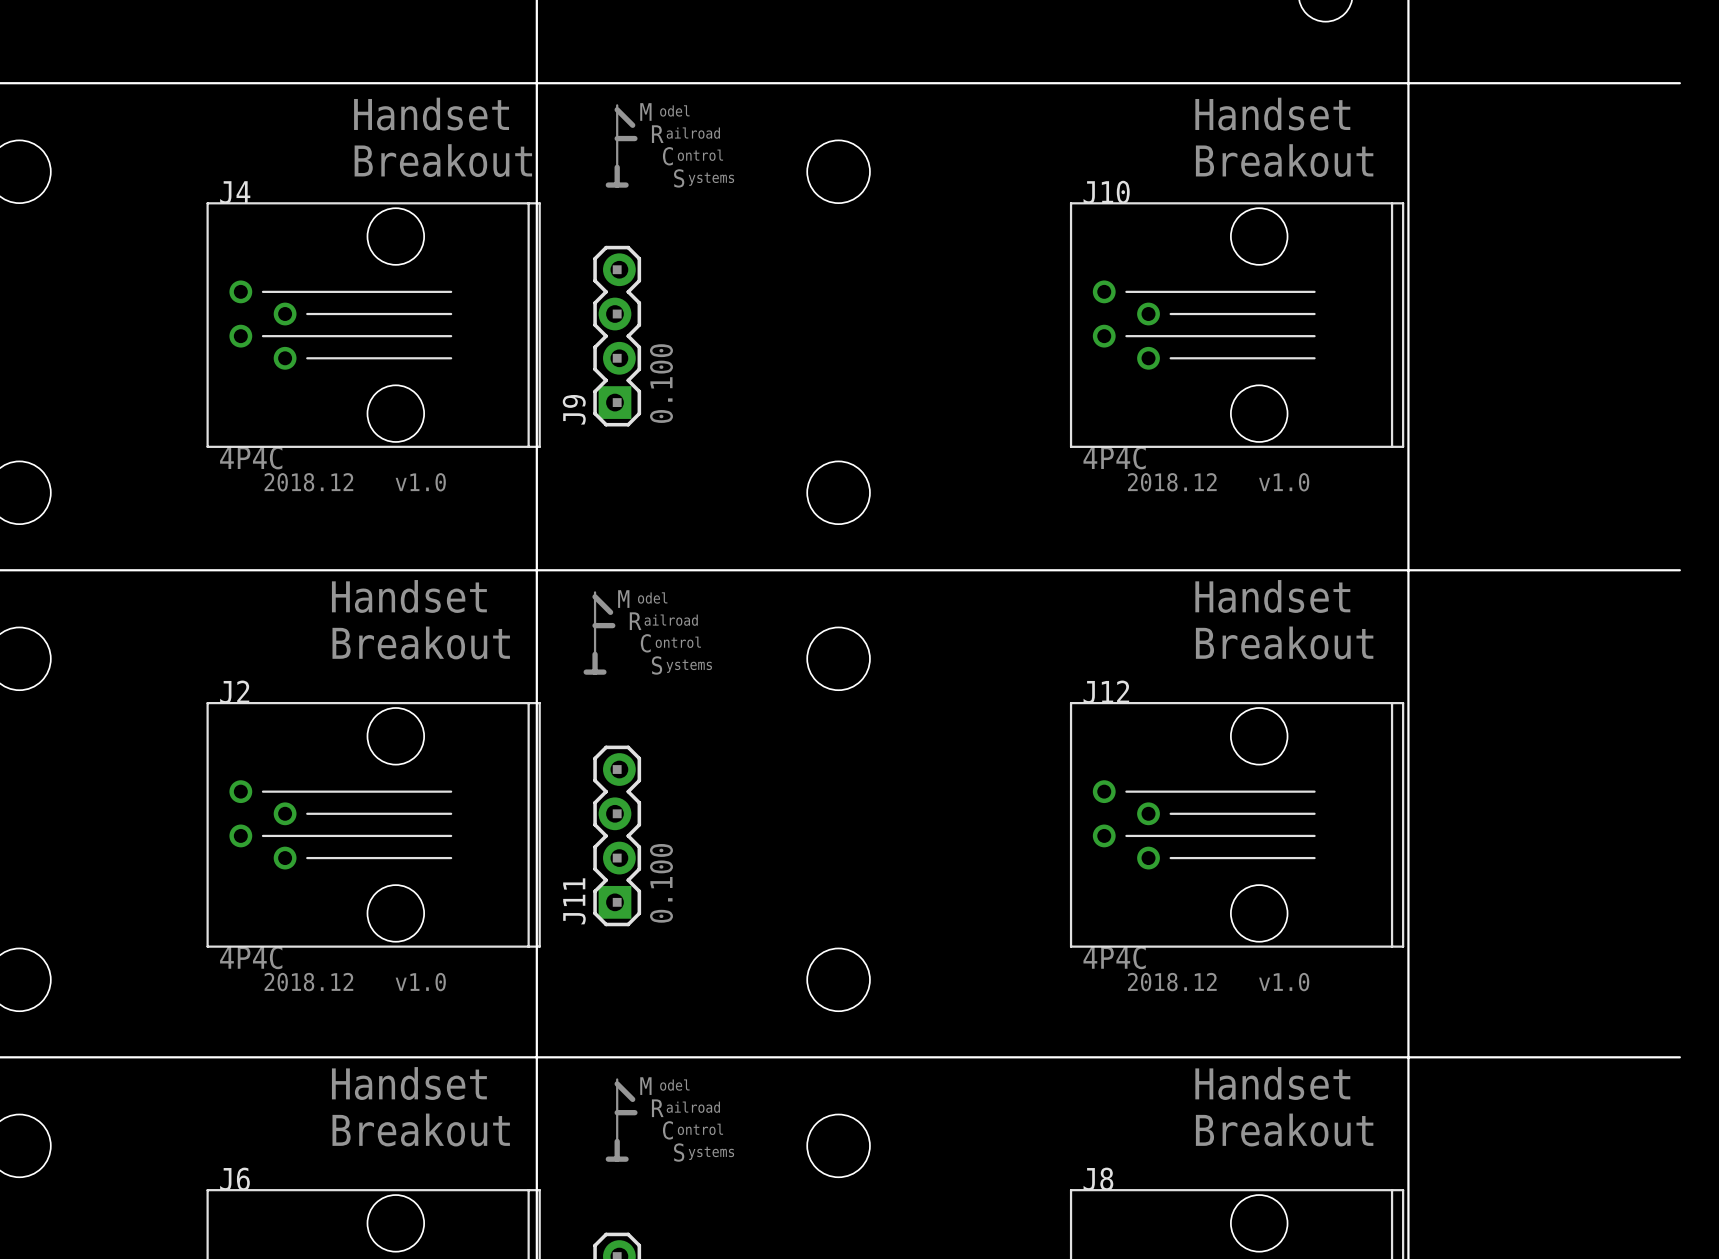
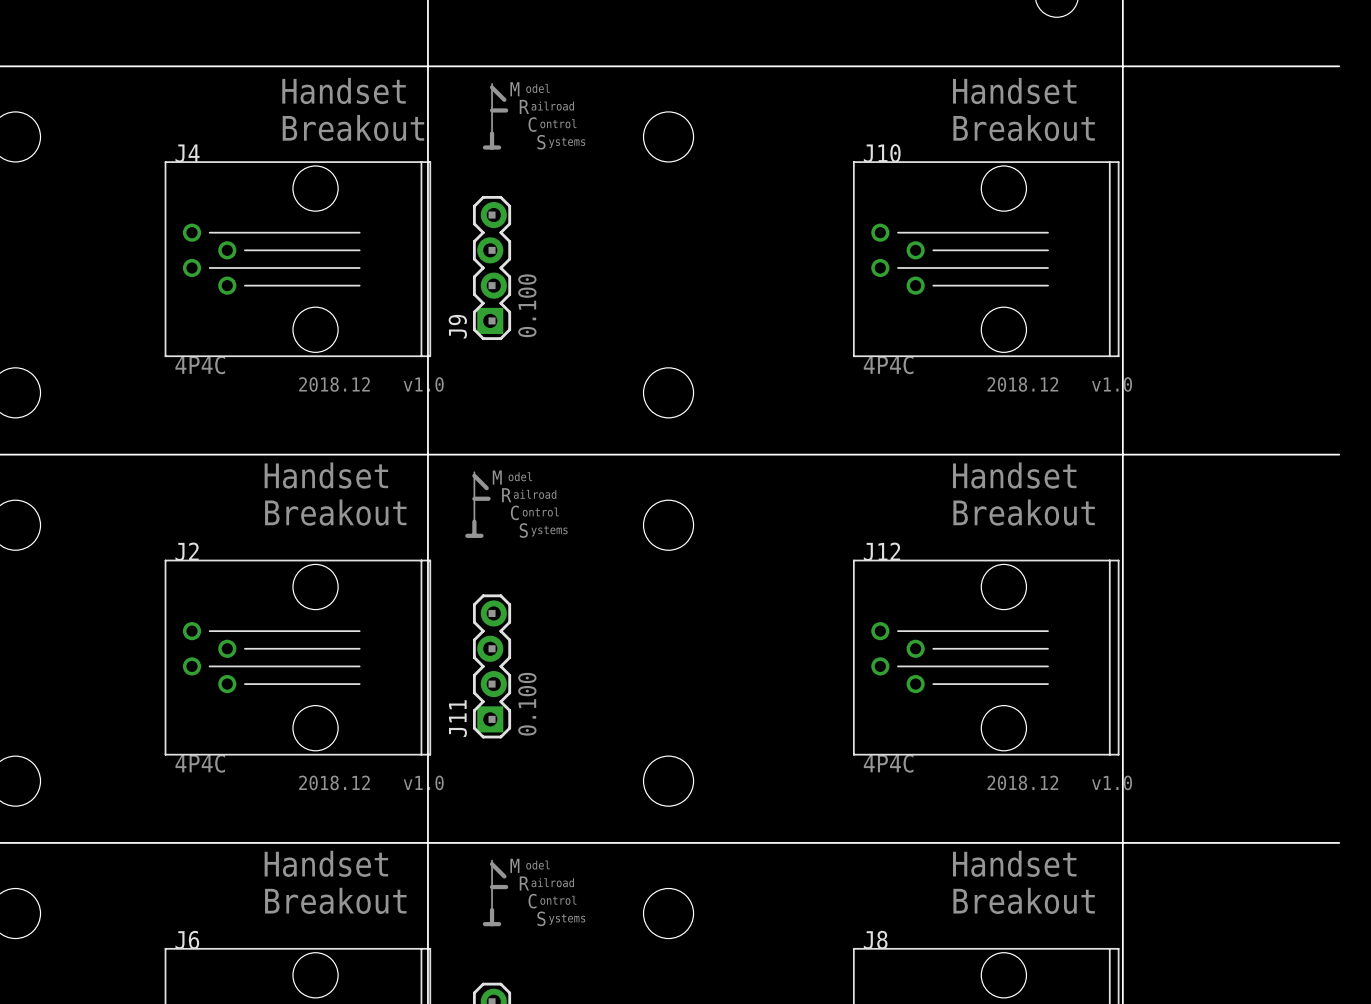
text position: 2018.12 v1.0 (355, 482) -> 2018.12 v1.0 (371, 384)
text position: 2018.12 v1.0 (1218, 482) -> 2018.12 v1.0 (1059, 384)
text position: 2018.12 v1.0 (355, 982) -> 2018.12 v1.0 (371, 782)
text position: 2018.12 v1.0 (1218, 982) -> 2018.12 v1.0 (1059, 782)

